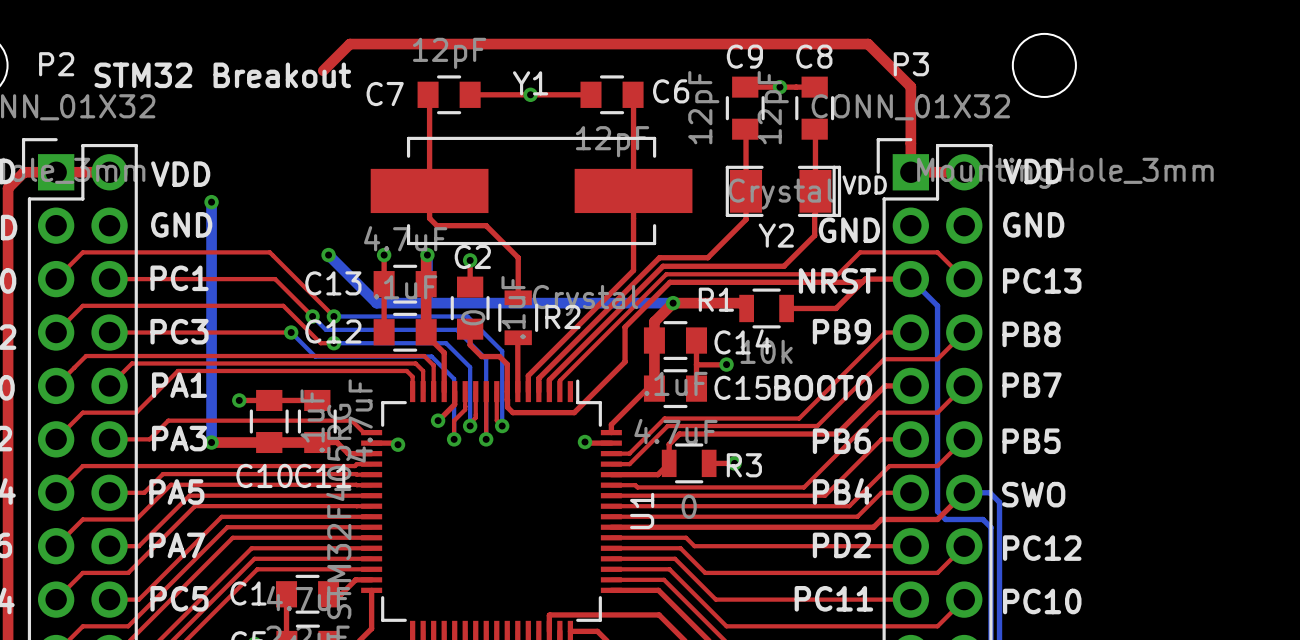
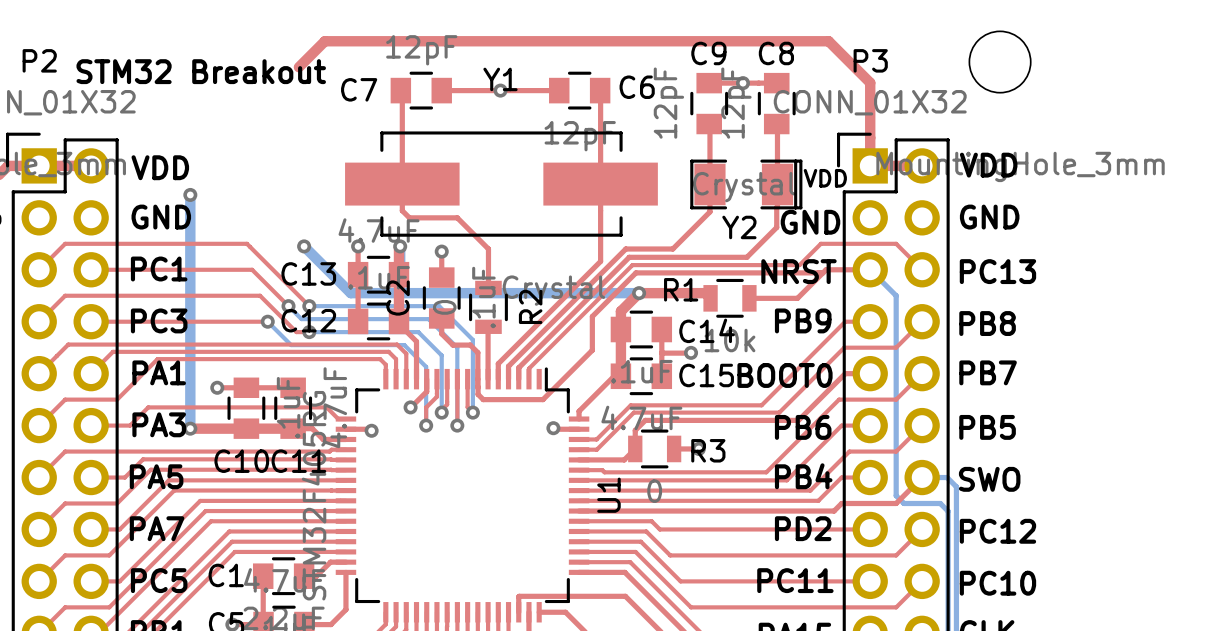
C2 name rotation: 0° (472, 256) -> 90° counterclockwise (398, 298)
C2 name position: C2 (472, 256) -> C2 (398, 298)
R2 name rotation: 0° (562, 316) -> 90° counterclockwise (530, 306)

